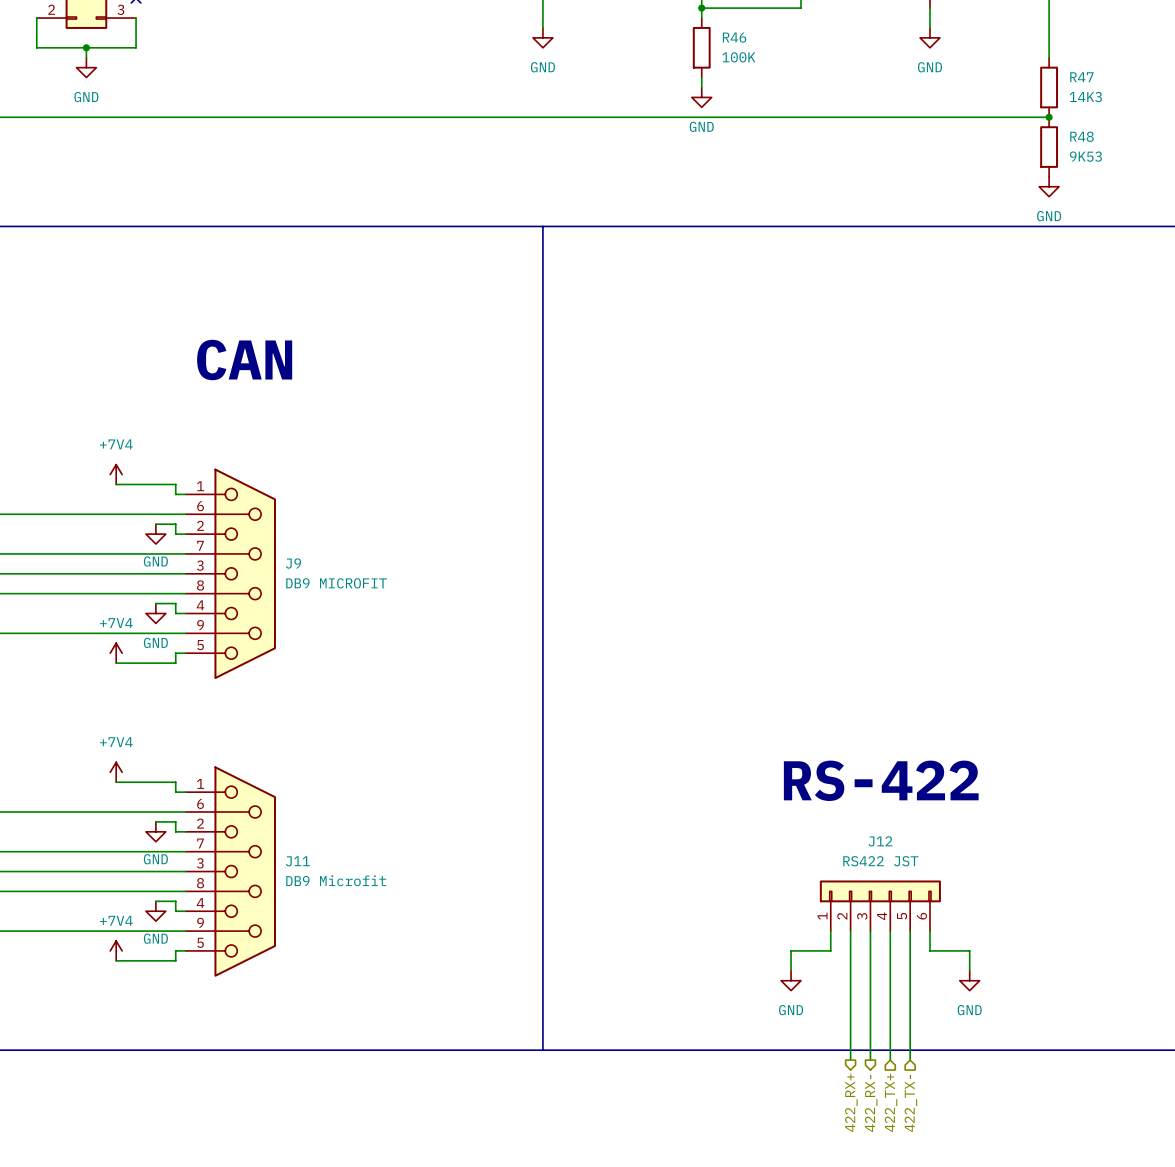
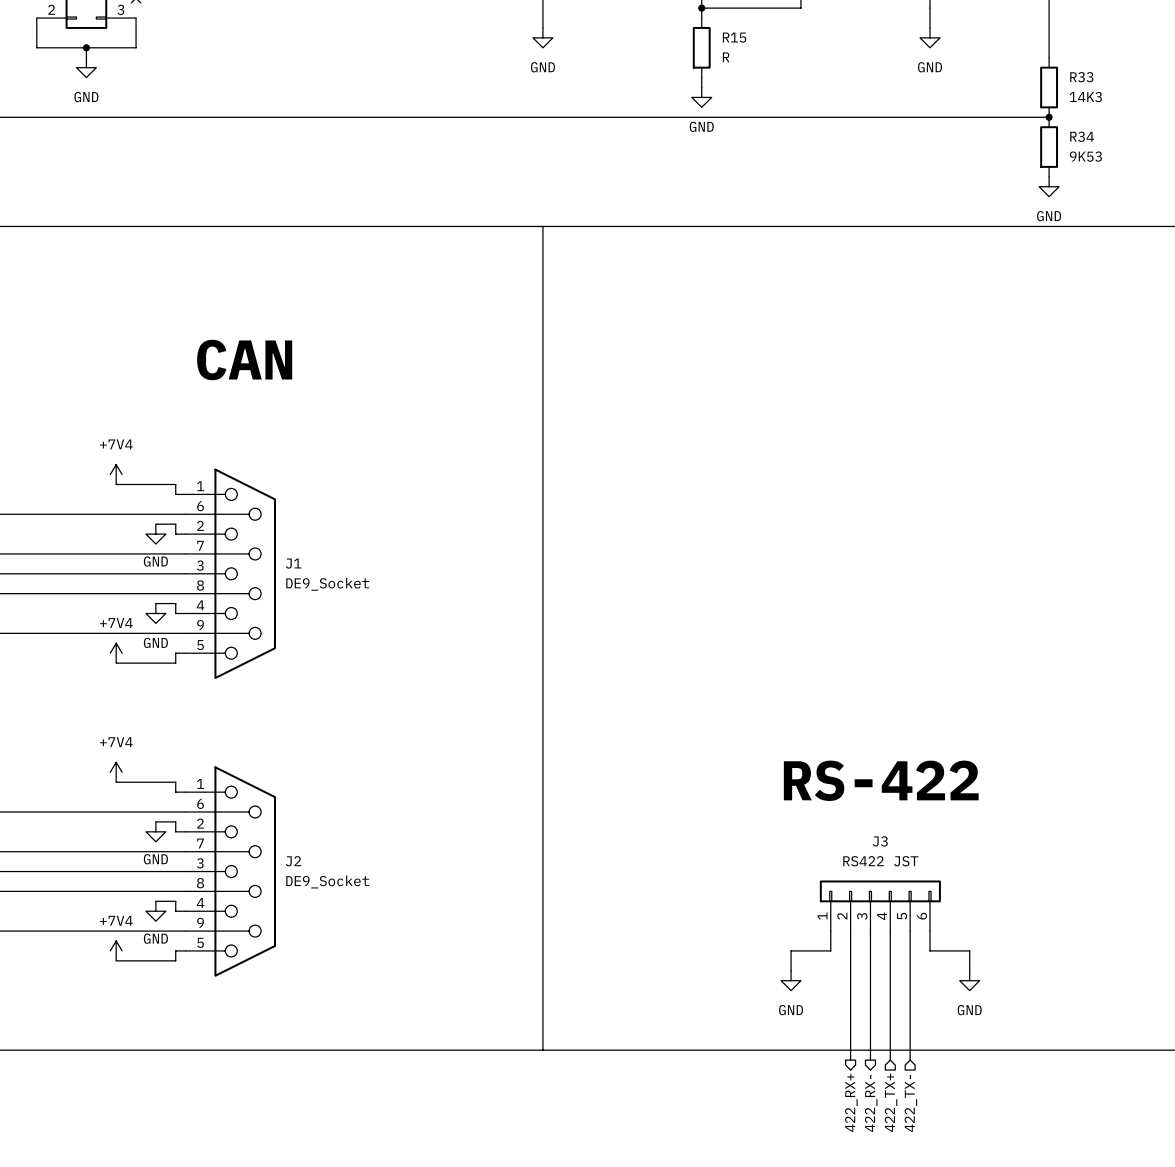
R46 name: R46 (734, 37) -> R15 (734, 37)
R46 value: 100K (738, 57) -> R (726, 57)
R47 name: R47 (1081, 77) -> R33 (1081, 77)
R48 name: R48 (1081, 136) -> R34 (1082, 136)
J9 name: J9 (293, 563) -> J1 (293, 563)
J9 value: DB9 MICROFIT (336, 583) -> DE9_Socket (327, 584)
J12 name: J12 (880, 841) -> J3 (880, 841)
J11 name: J11 (297, 861) -> J2 (293, 861)
J11 value: DB9 Microfit (336, 880) -> DE9_Socket (327, 882)

